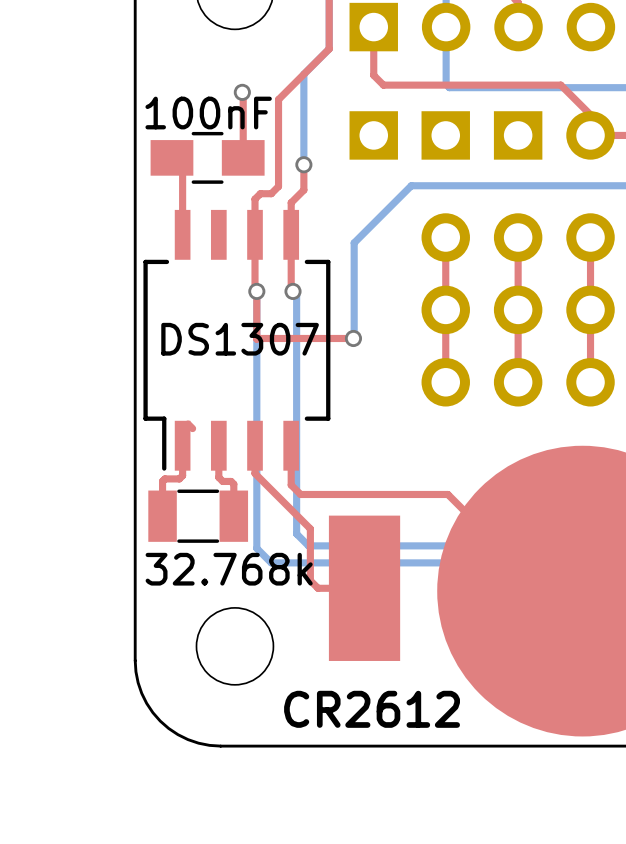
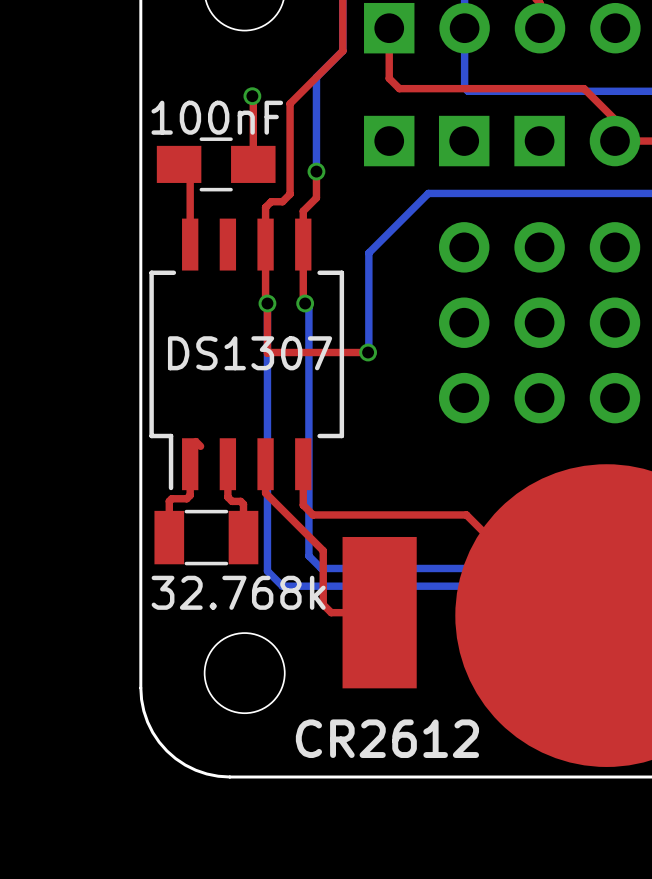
part footprint: [421, 213, 470, 407] -> [438, 222, 490, 424]
part footprint: [493, 213, 543, 407] -> [514, 222, 565, 424]
part footprint: [566, 213, 615, 407] -> [589, 222, 641, 424]

